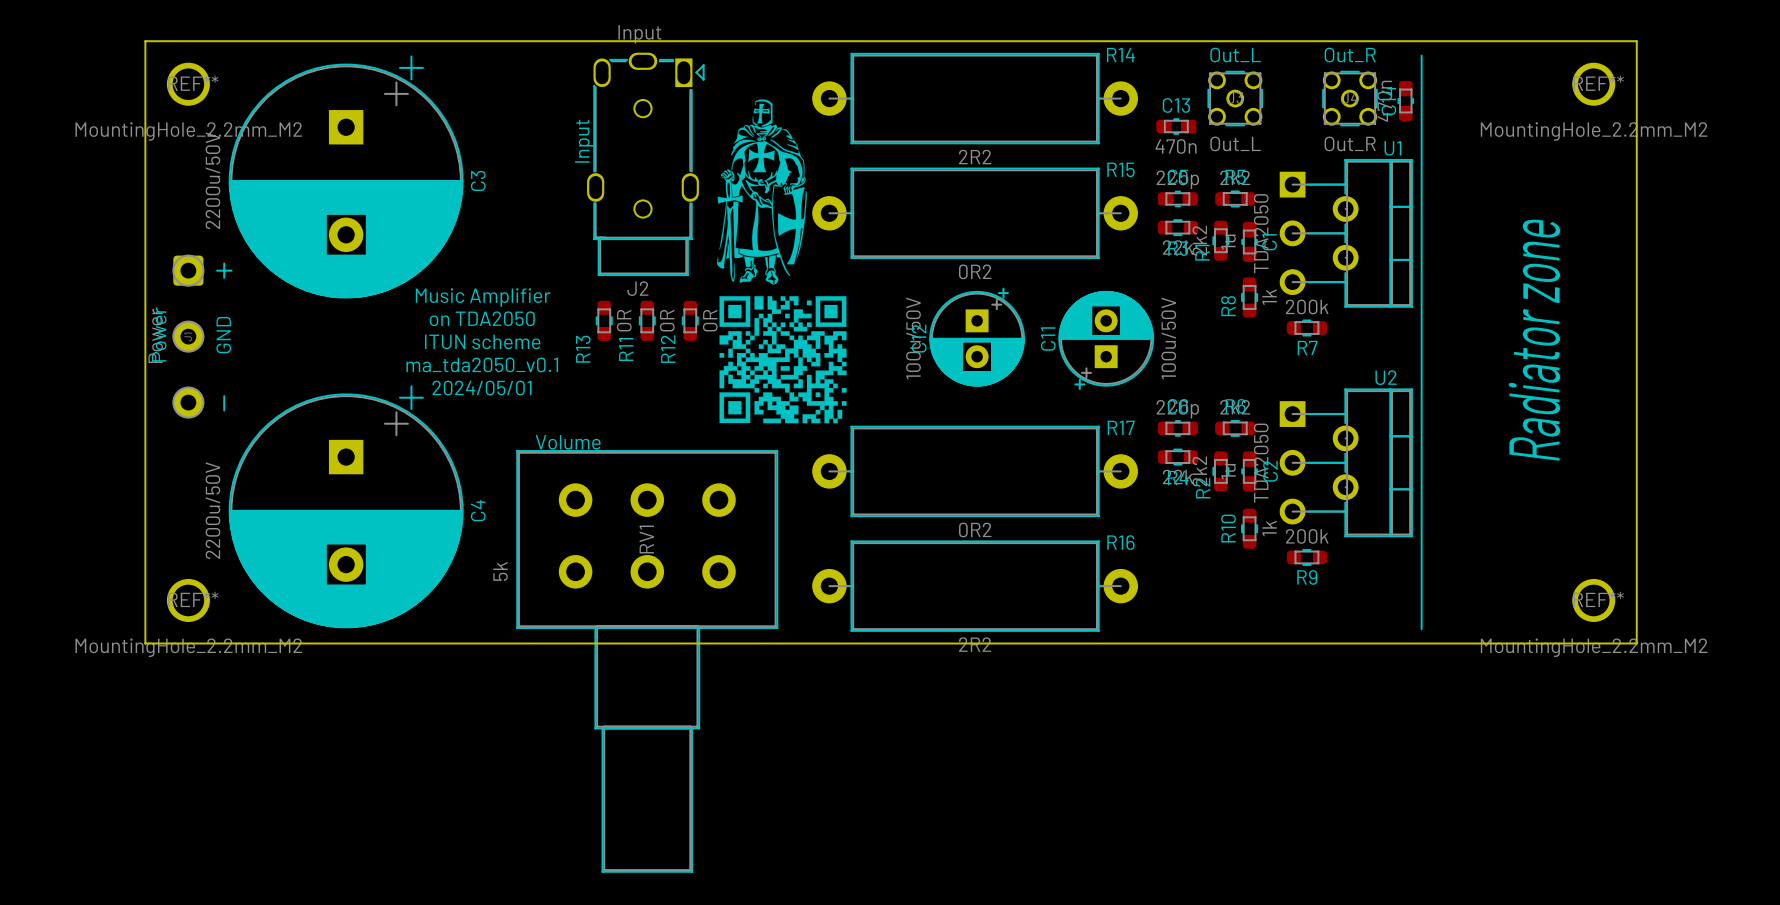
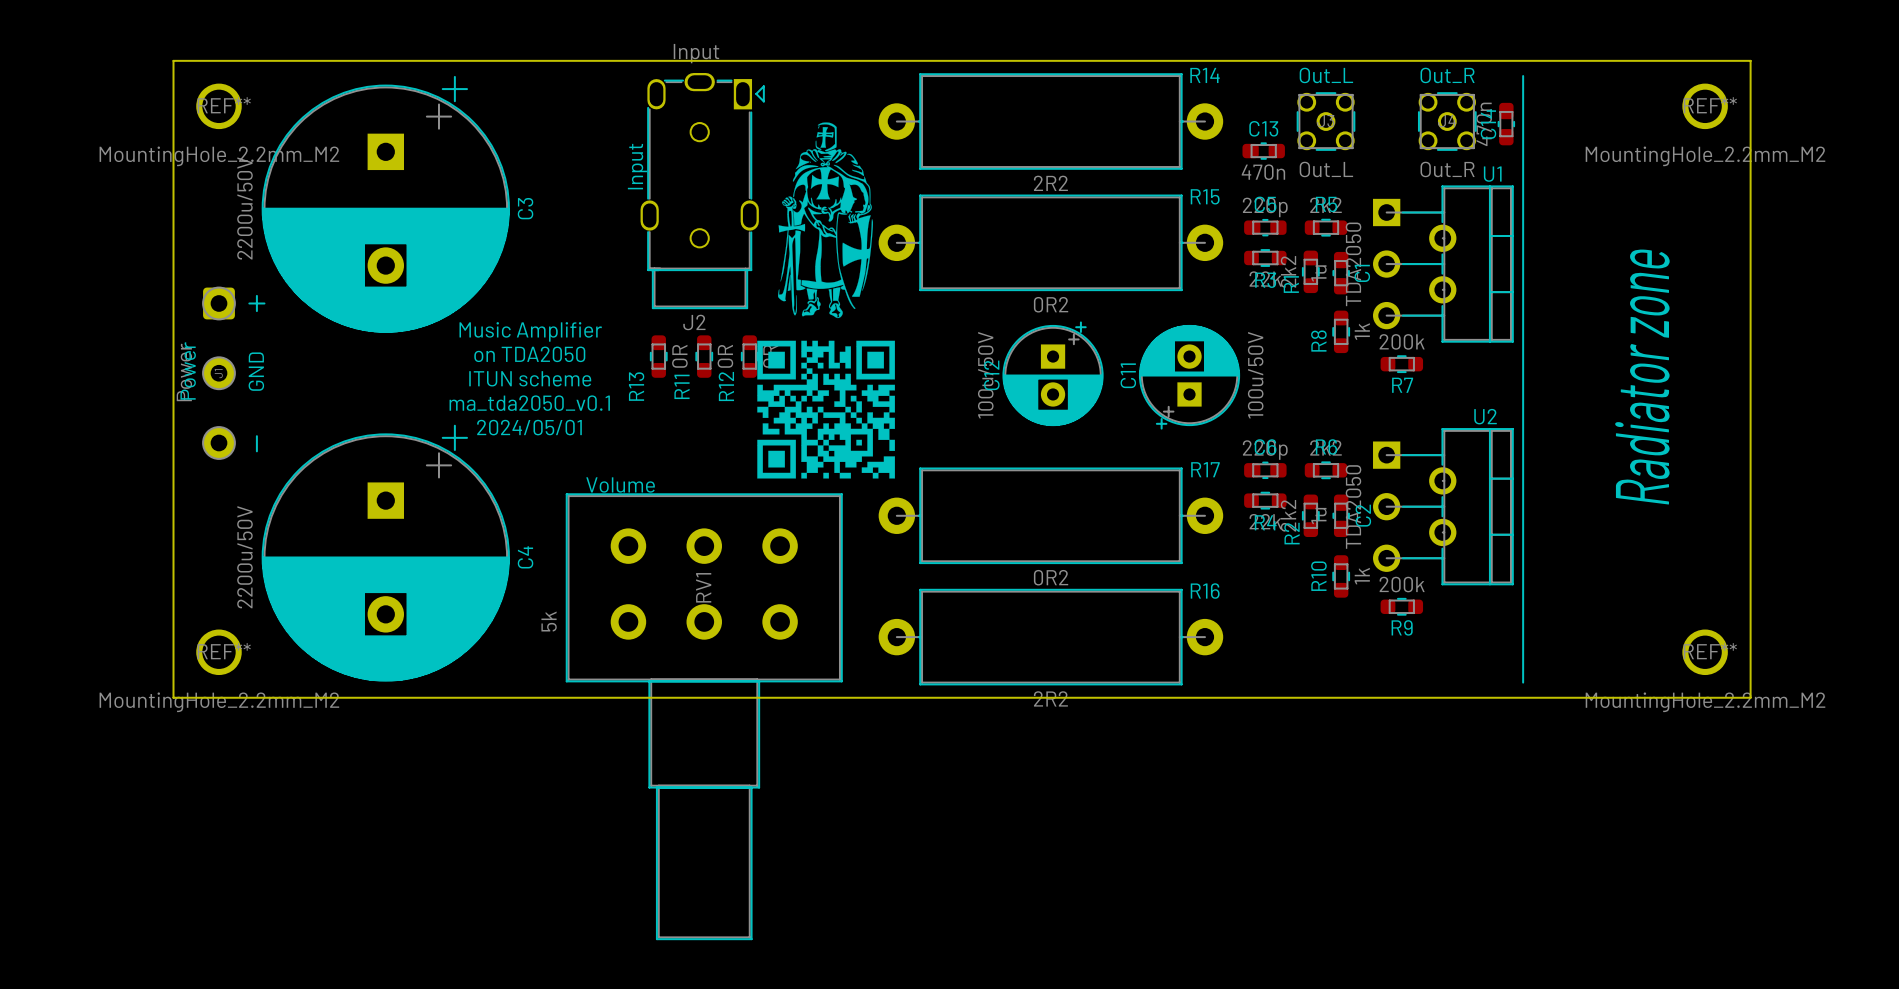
drawing: [719, 296, 847, 424] -> none
drawing: none -> [757, 340, 895, 479]

